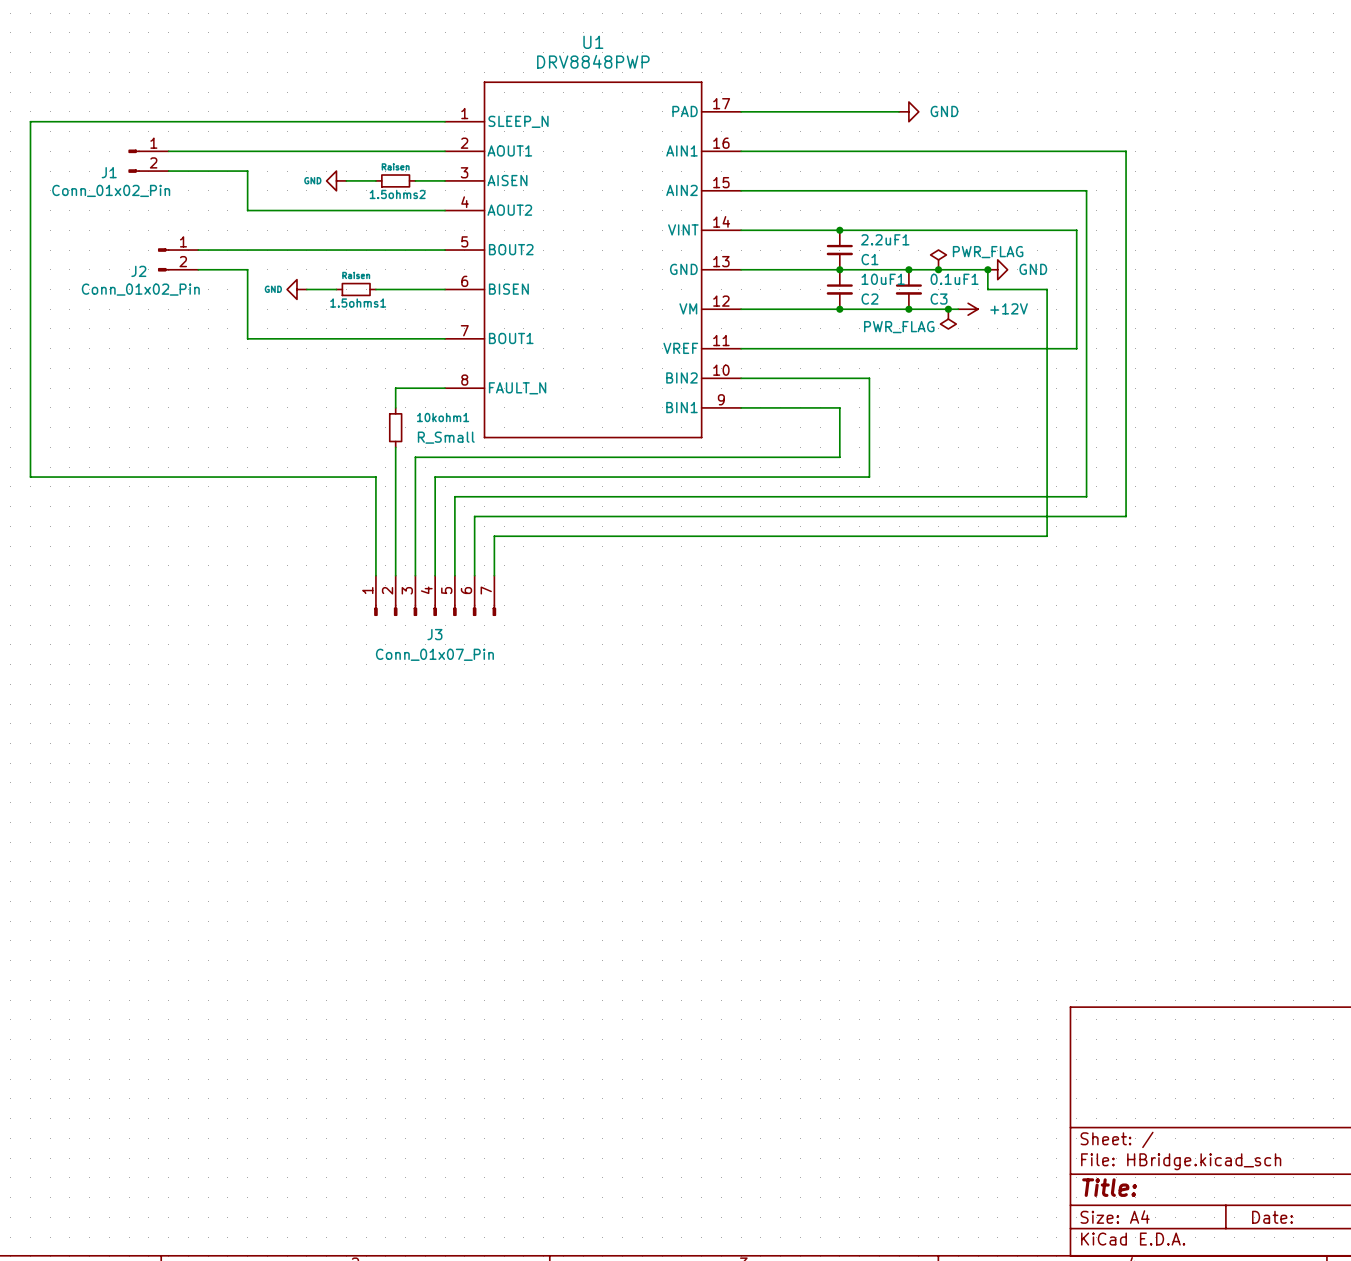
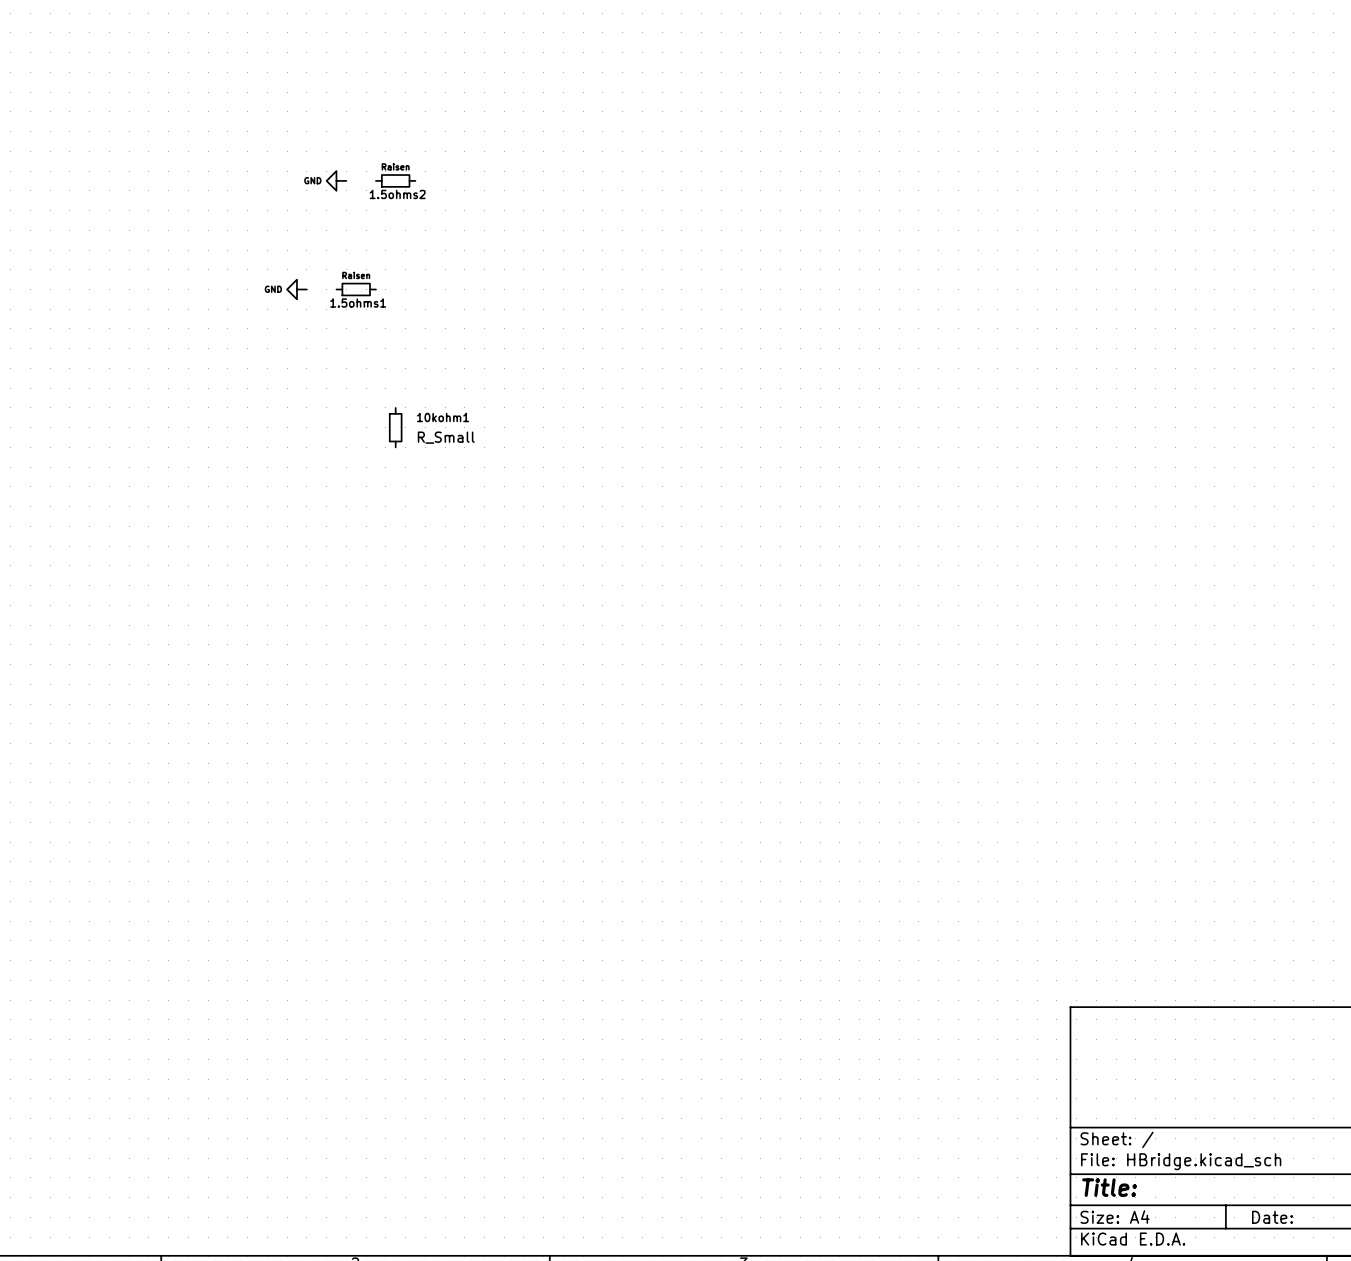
wire: (741, 111) (899, 111) -> none
power symbol: GND (908, 111) -> none
wire: (445, 121) (30, 121) (30, 477) (375, 477) (375, 575) -> none
wire: (168, 151) (445, 151) -> none
wire: (741, 151) (1126, 151) (1126, 516) (474, 516) (474, 575) -> none
J1: Conn_01x02_Pin (148, 161) -> none
wire: (168, 171) (247, 171) (247, 210) (445, 210) -> none
wire: (346, 180) (375, 180) -> none
wire: (415, 180) (445, 180) -> none
wire: (741, 190) (1086, 190) (1086, 496) (454, 496) (454, 575) -> none
wire: (741, 230) (1076, 230) (1076, 348) (741, 348) -> none
junction: (839, 230) -> none
wire: (198, 250) (445, 250) -> none
2.2uF1: C1 (839, 250) -> none
J2: Conn_01x02_Pin (178, 259) -> none
U1: DRV8848PWP (593, 259) -> none
power symbol: PWR_FLAG (938, 259) -> none
wire: (198, 269) (247, 269) (247, 338) (445, 338) -> none
wire: (741, 269) (987, 269) (987, 289) (1047, 289) (1047, 536) (494, 536) (494, 575) -> none
junction: (839, 269) -> none
junction: (908, 269) -> none
junction: (938, 269) -> none
junction: (987, 269) -> none
power symbol: GND (997, 269) -> none
wire: (306, 289) (336, 289) -> none
wire: (375, 289) (445, 289) -> none
10uF1: C2 (839, 289) -> none
0.1uF1: C3 (908, 289) -> none
wire: (741, 309) (958, 309) -> none
junction: (839, 309) -> none
junction: (908, 309) -> none
junction: (948, 309) -> none
power symbol: +12V (968, 309) -> none
power symbol: PWR_FLAG (948, 319) -> none
wire: (741, 378) (869, 378) (869, 477) (435, 477) (435, 575) -> none
wire: (445, 388) (395, 388) (395, 407) -> none
wire: (741, 407) (839, 407) (839, 457) (415, 457) (415, 575) -> none
wire: (395, 447) (395, 575) -> none
J3: Conn_01x07_Pin (435, 595) -> none

